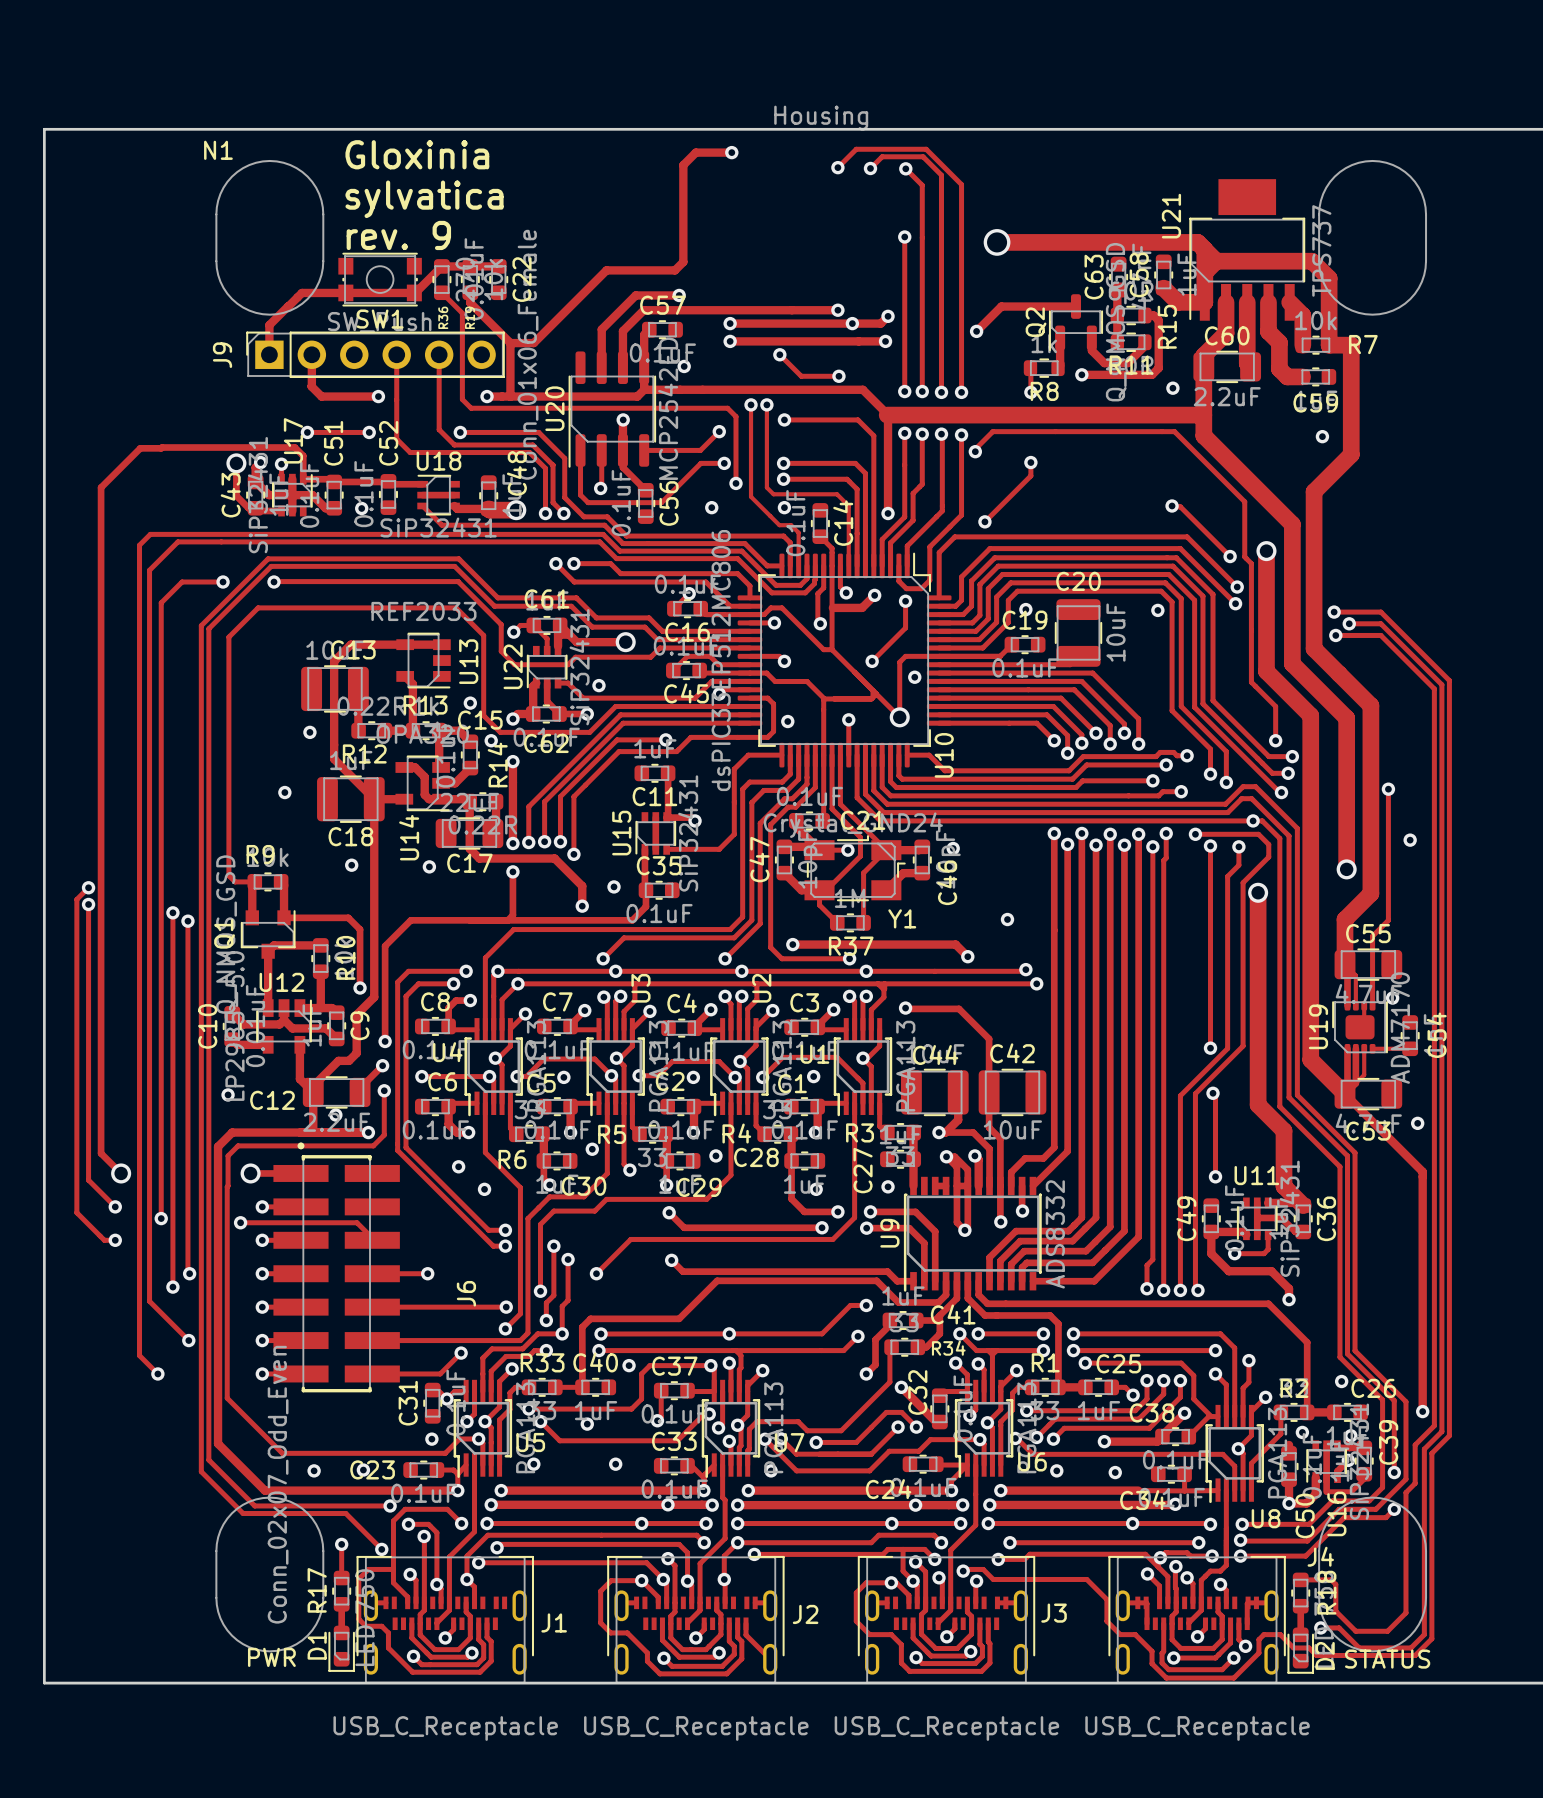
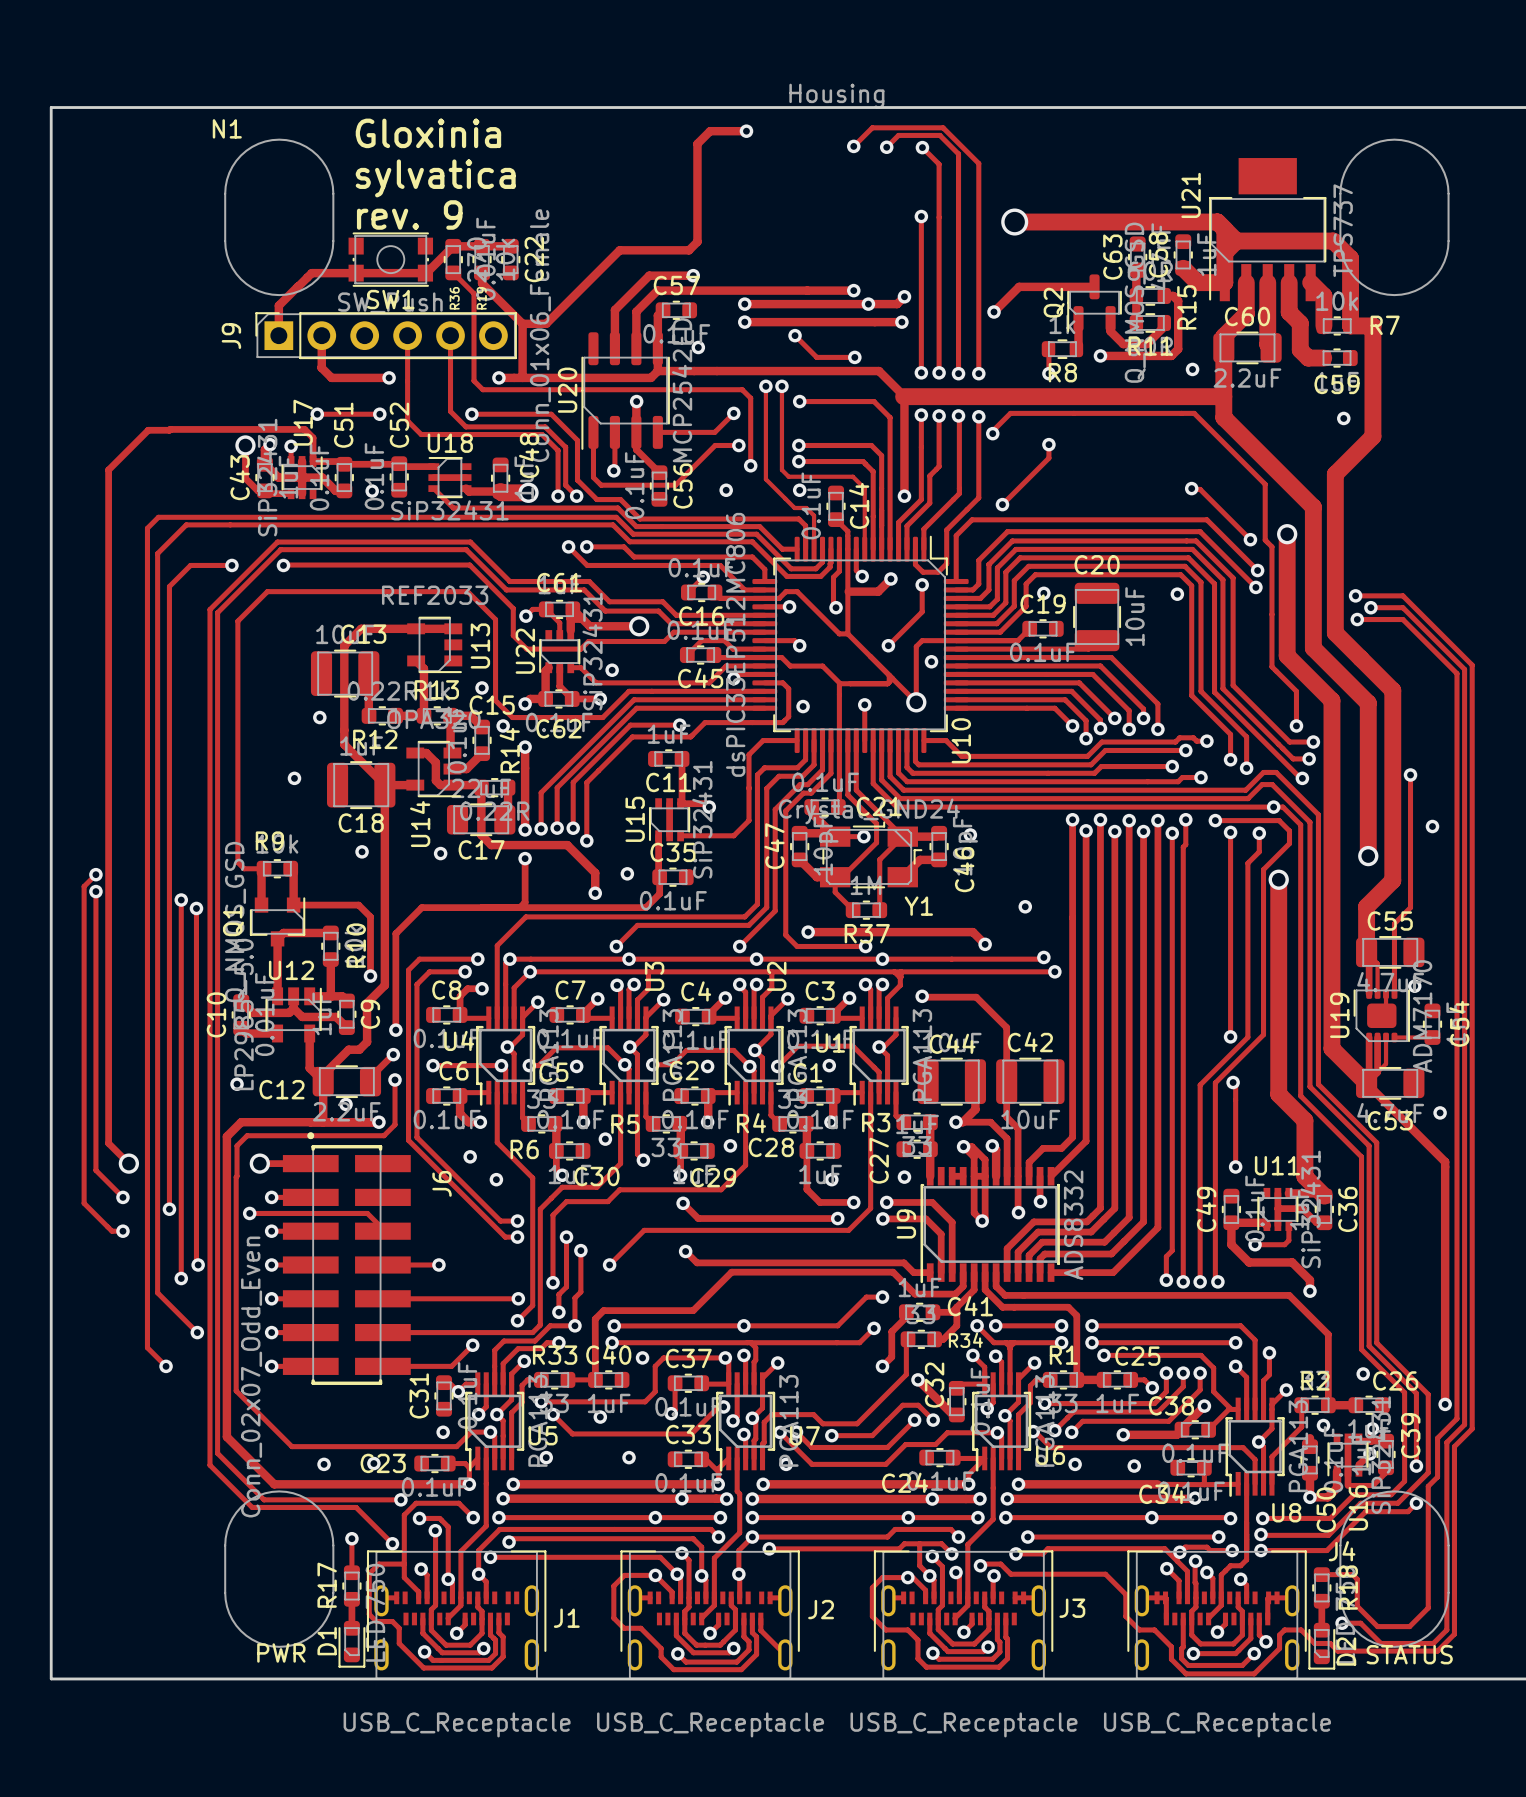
J6 name position: J6 (466, 1293) -> J6 (442, 1183)
J6 value position: Conn_02x07_Odd_Even (278, 1484) -> Conn_02x07_Odd_Even (251, 1377)

